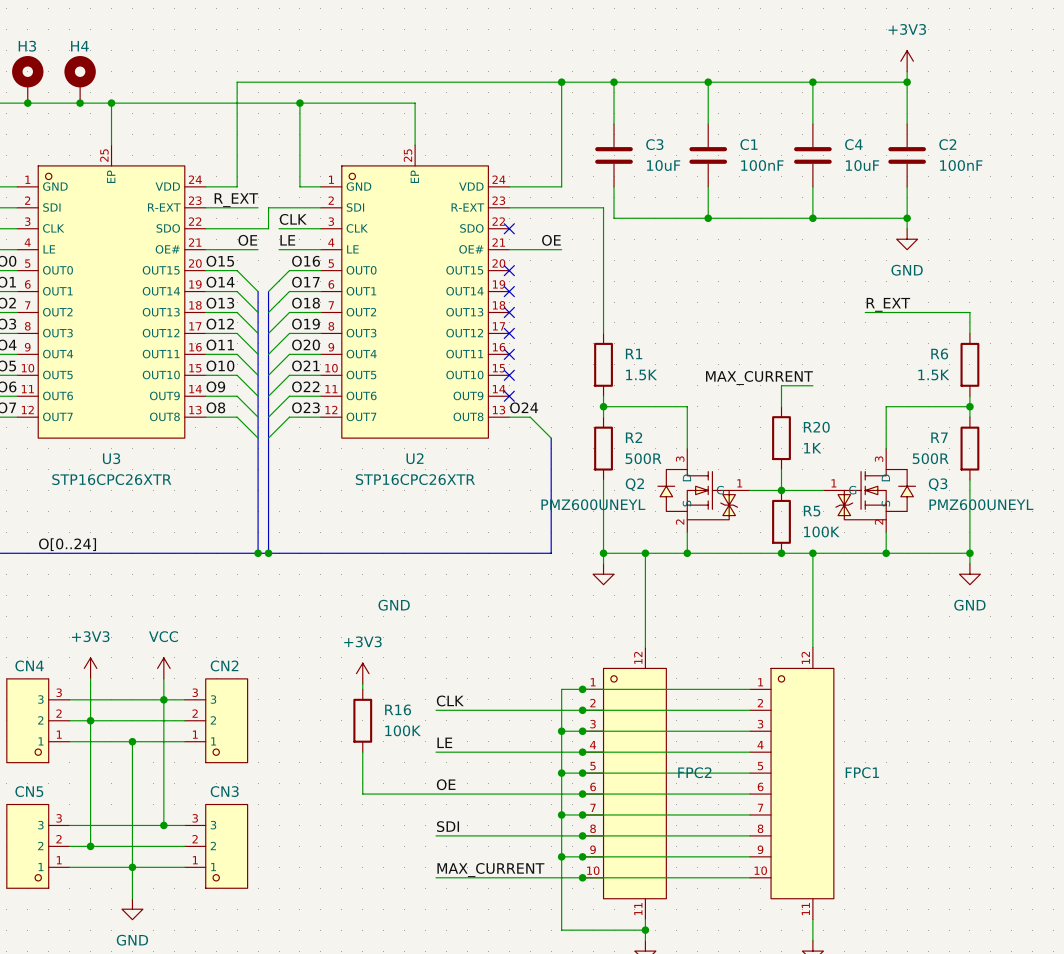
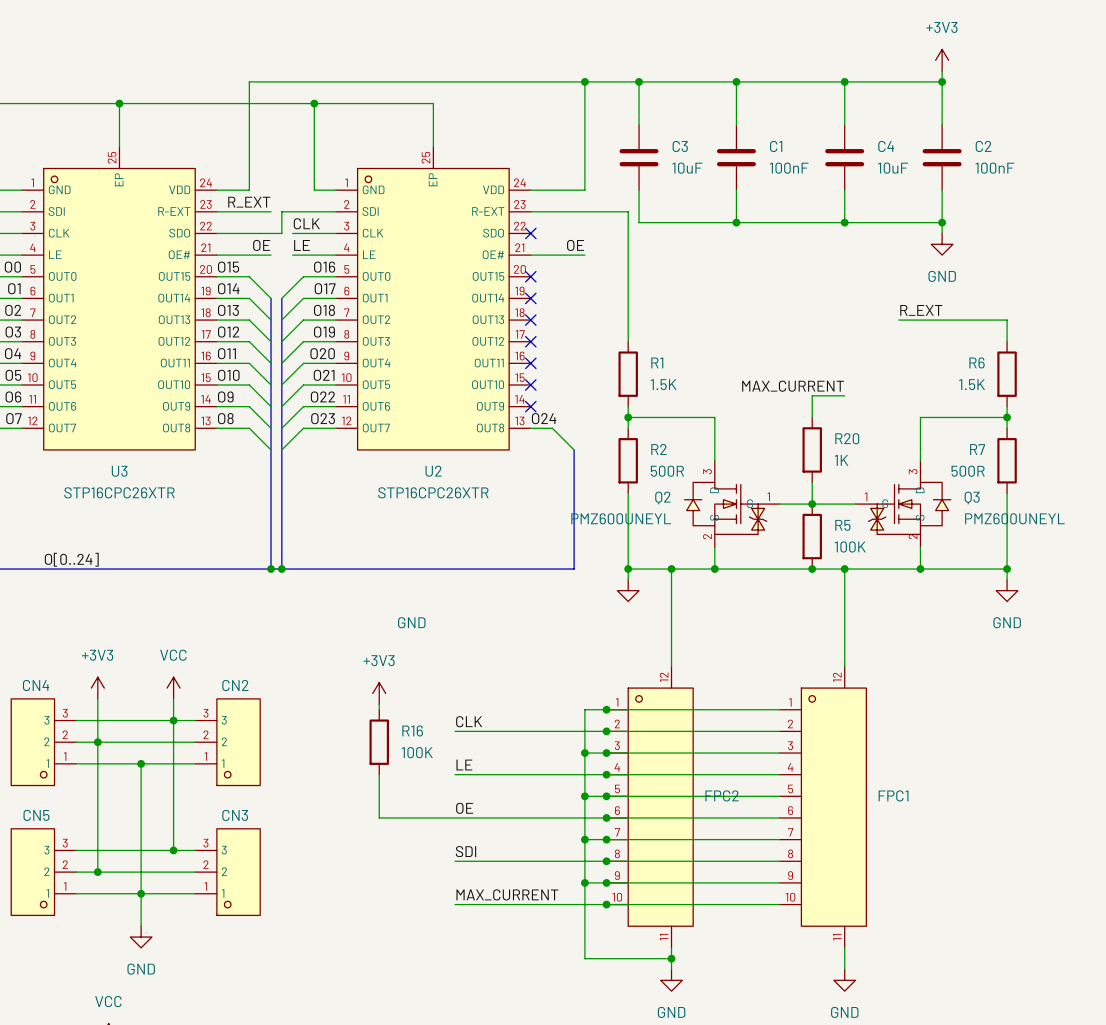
H3: (27, 79) -> none
H4: (80, 79) -> none
junction: (27, 103) -> none
junction: (80, 103) -> none

